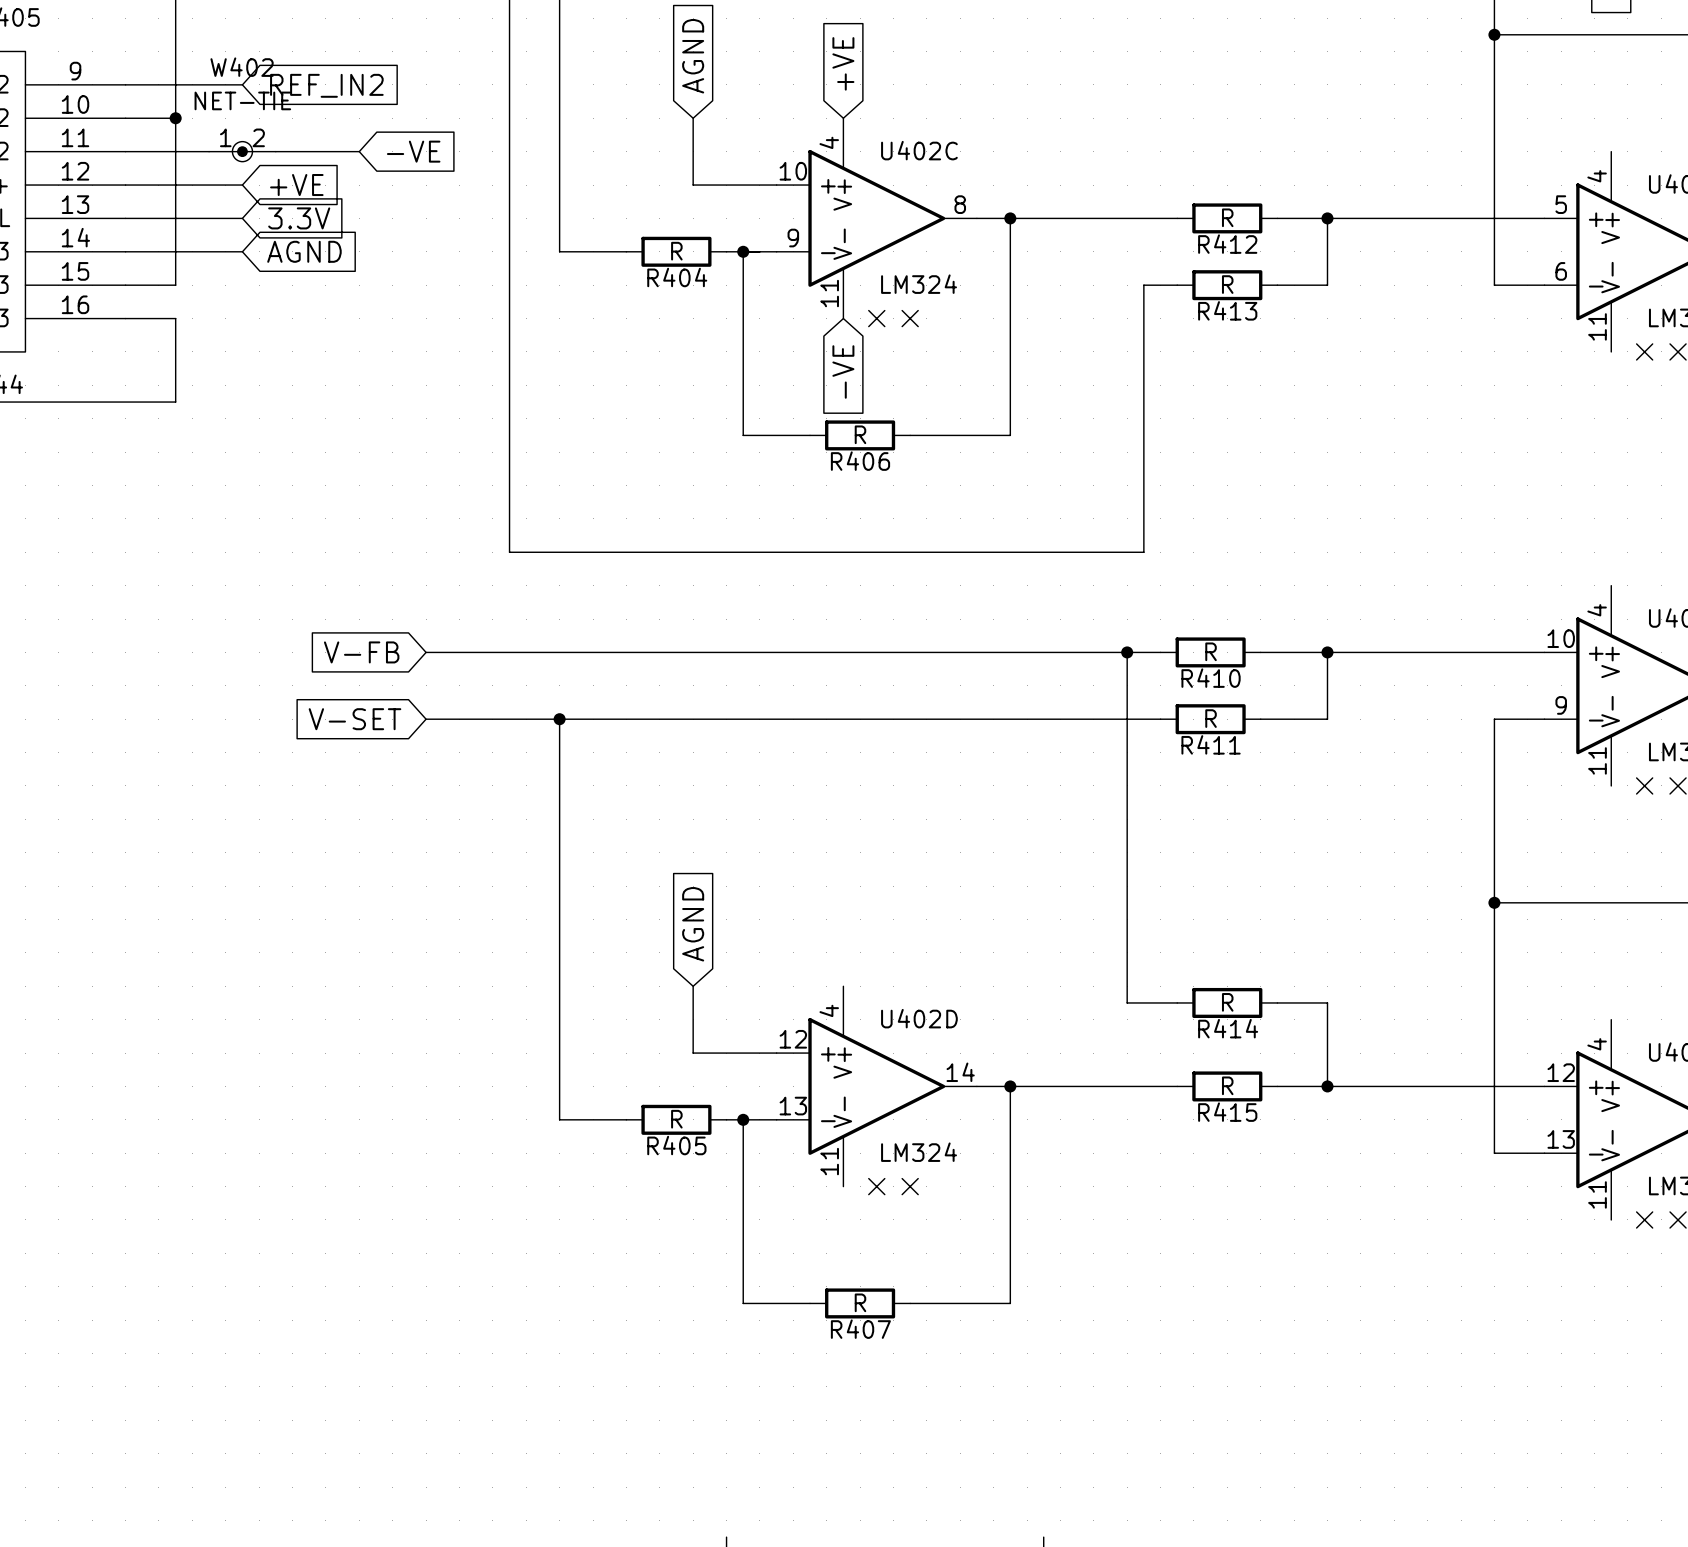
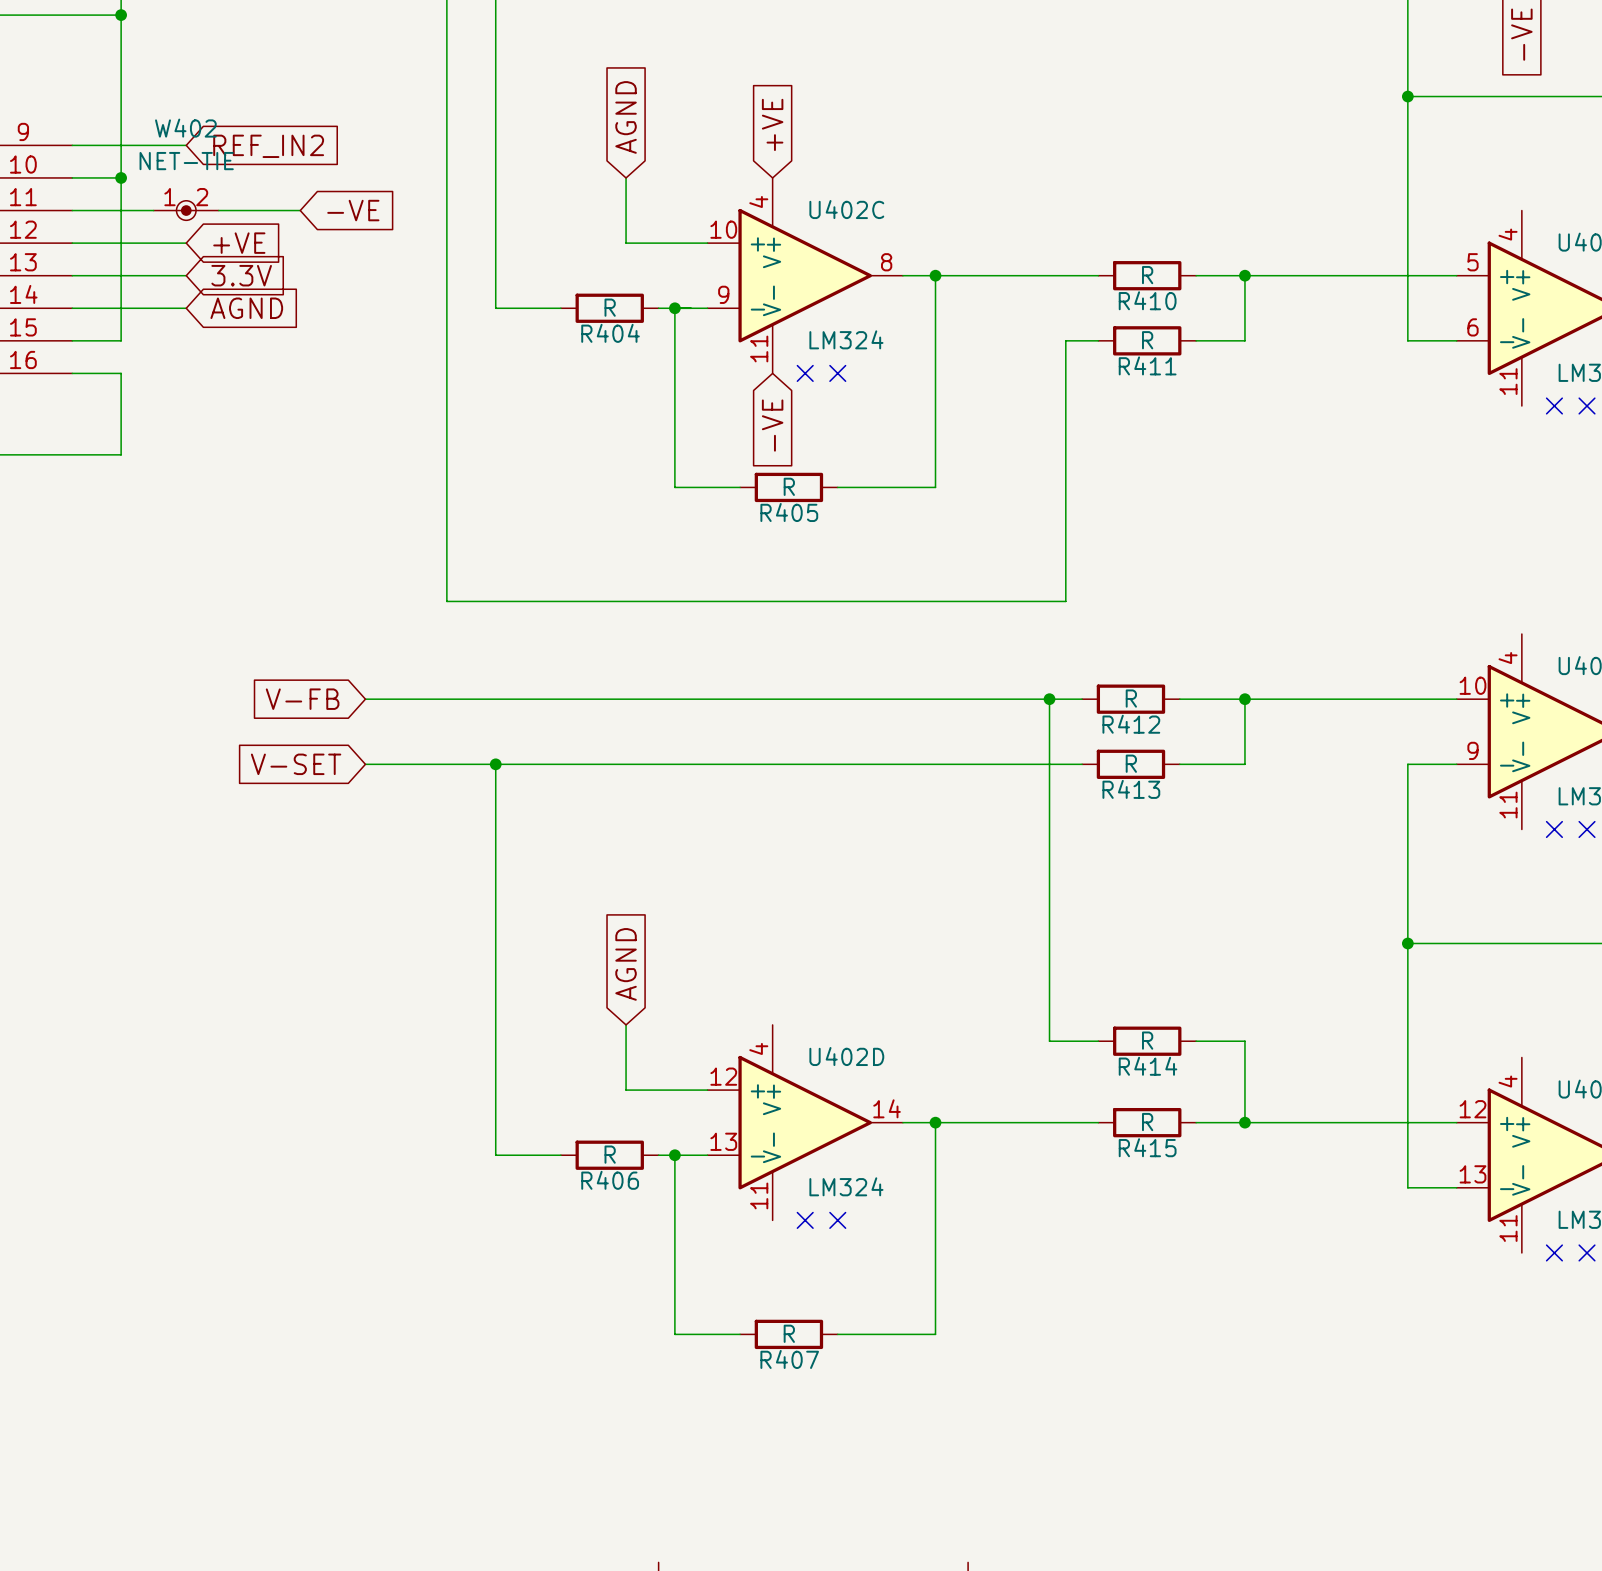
R412 name: R412 (1227, 244) -> R410 (1147, 300)
R413 name: R413 (1227, 310) -> R411 (1147, 365)
R406 name: R406 (860, 461) -> R405 (789, 512)
R410 name: R410 (1211, 678) -> R412 (1131, 724)
R411 name: R411 (1211, 744) -> R413 (1131, 789)
R405 name: R405 (676, 1145) -> R406 (610, 1180)

